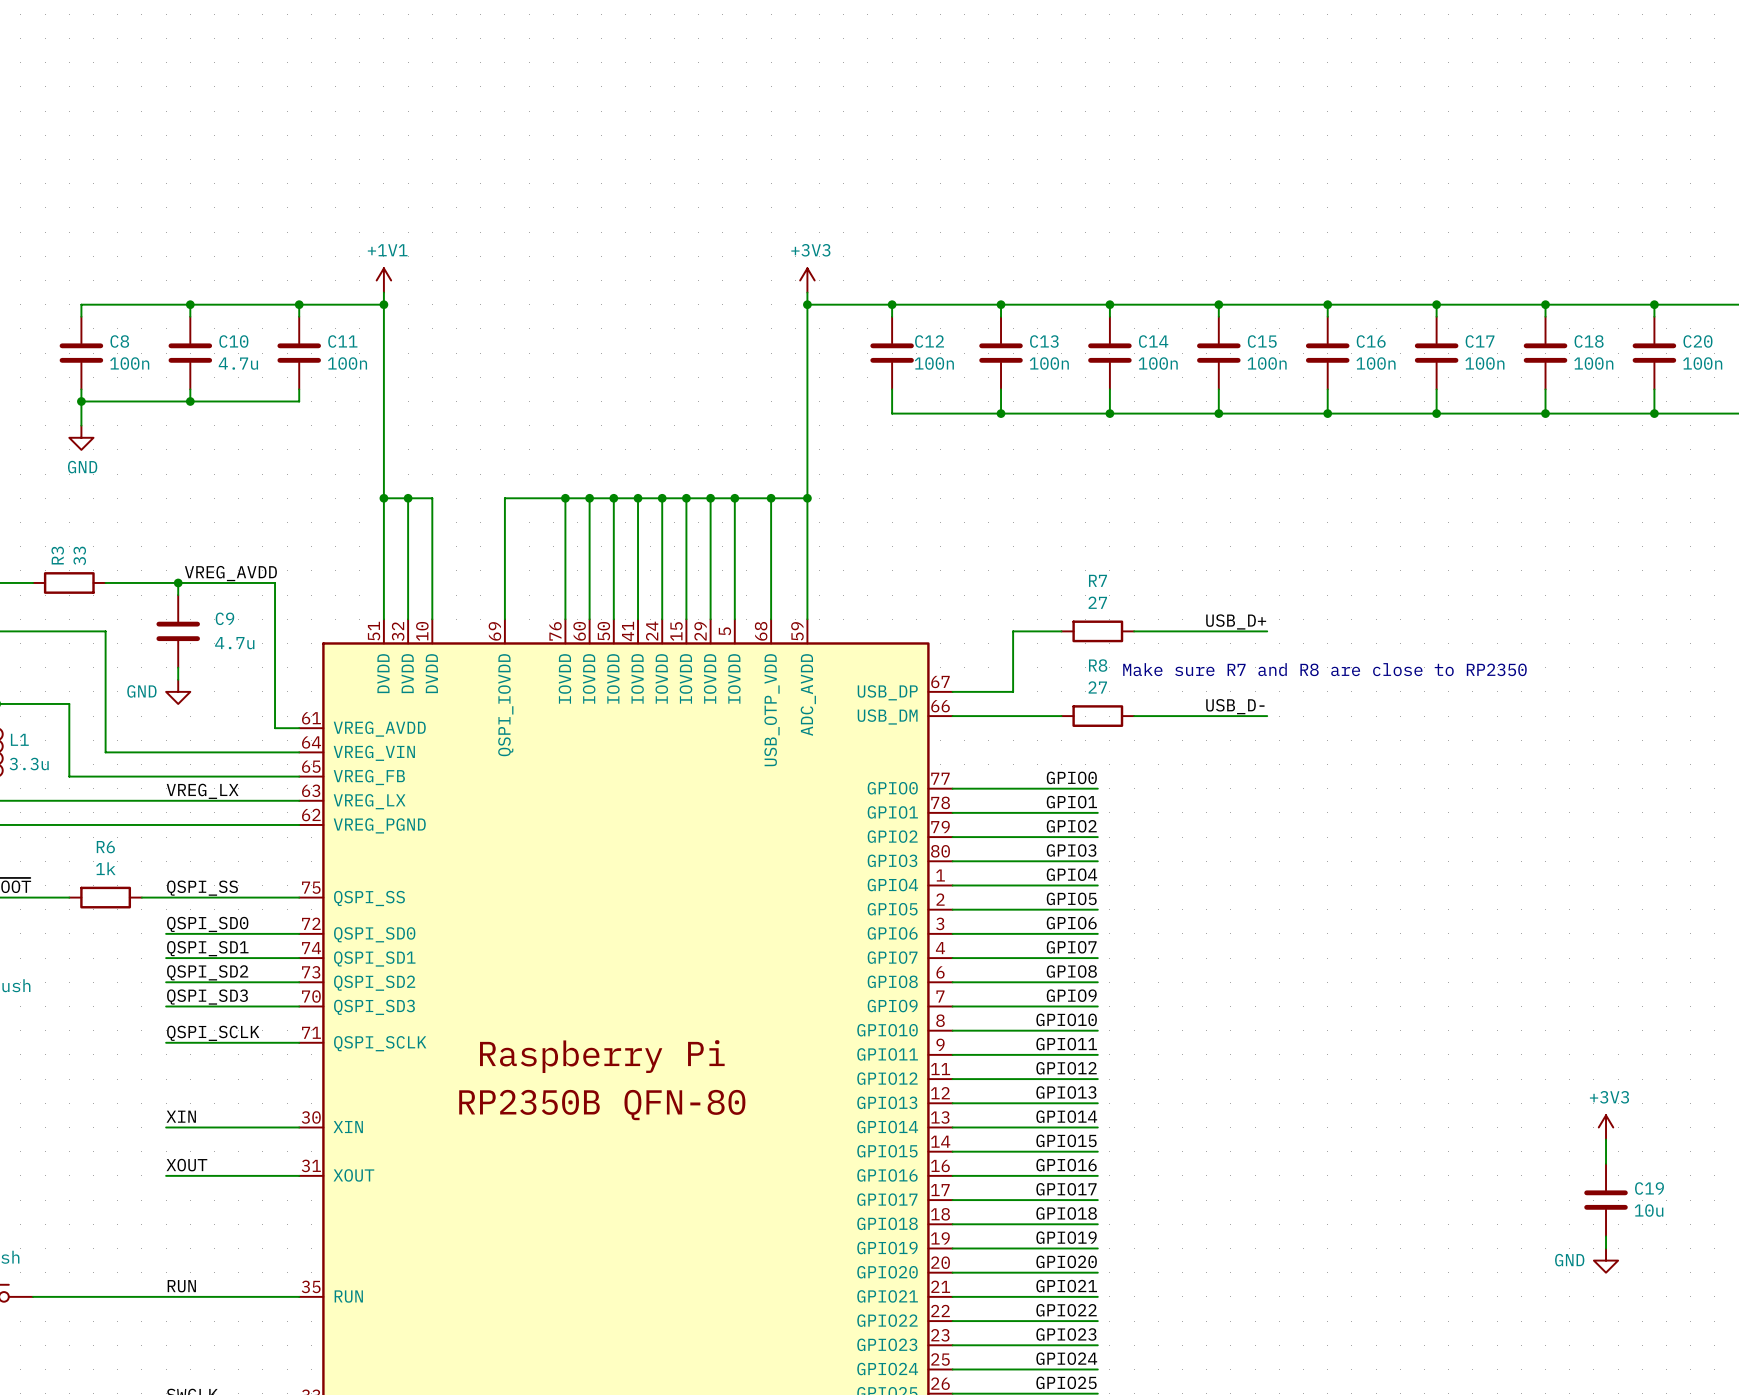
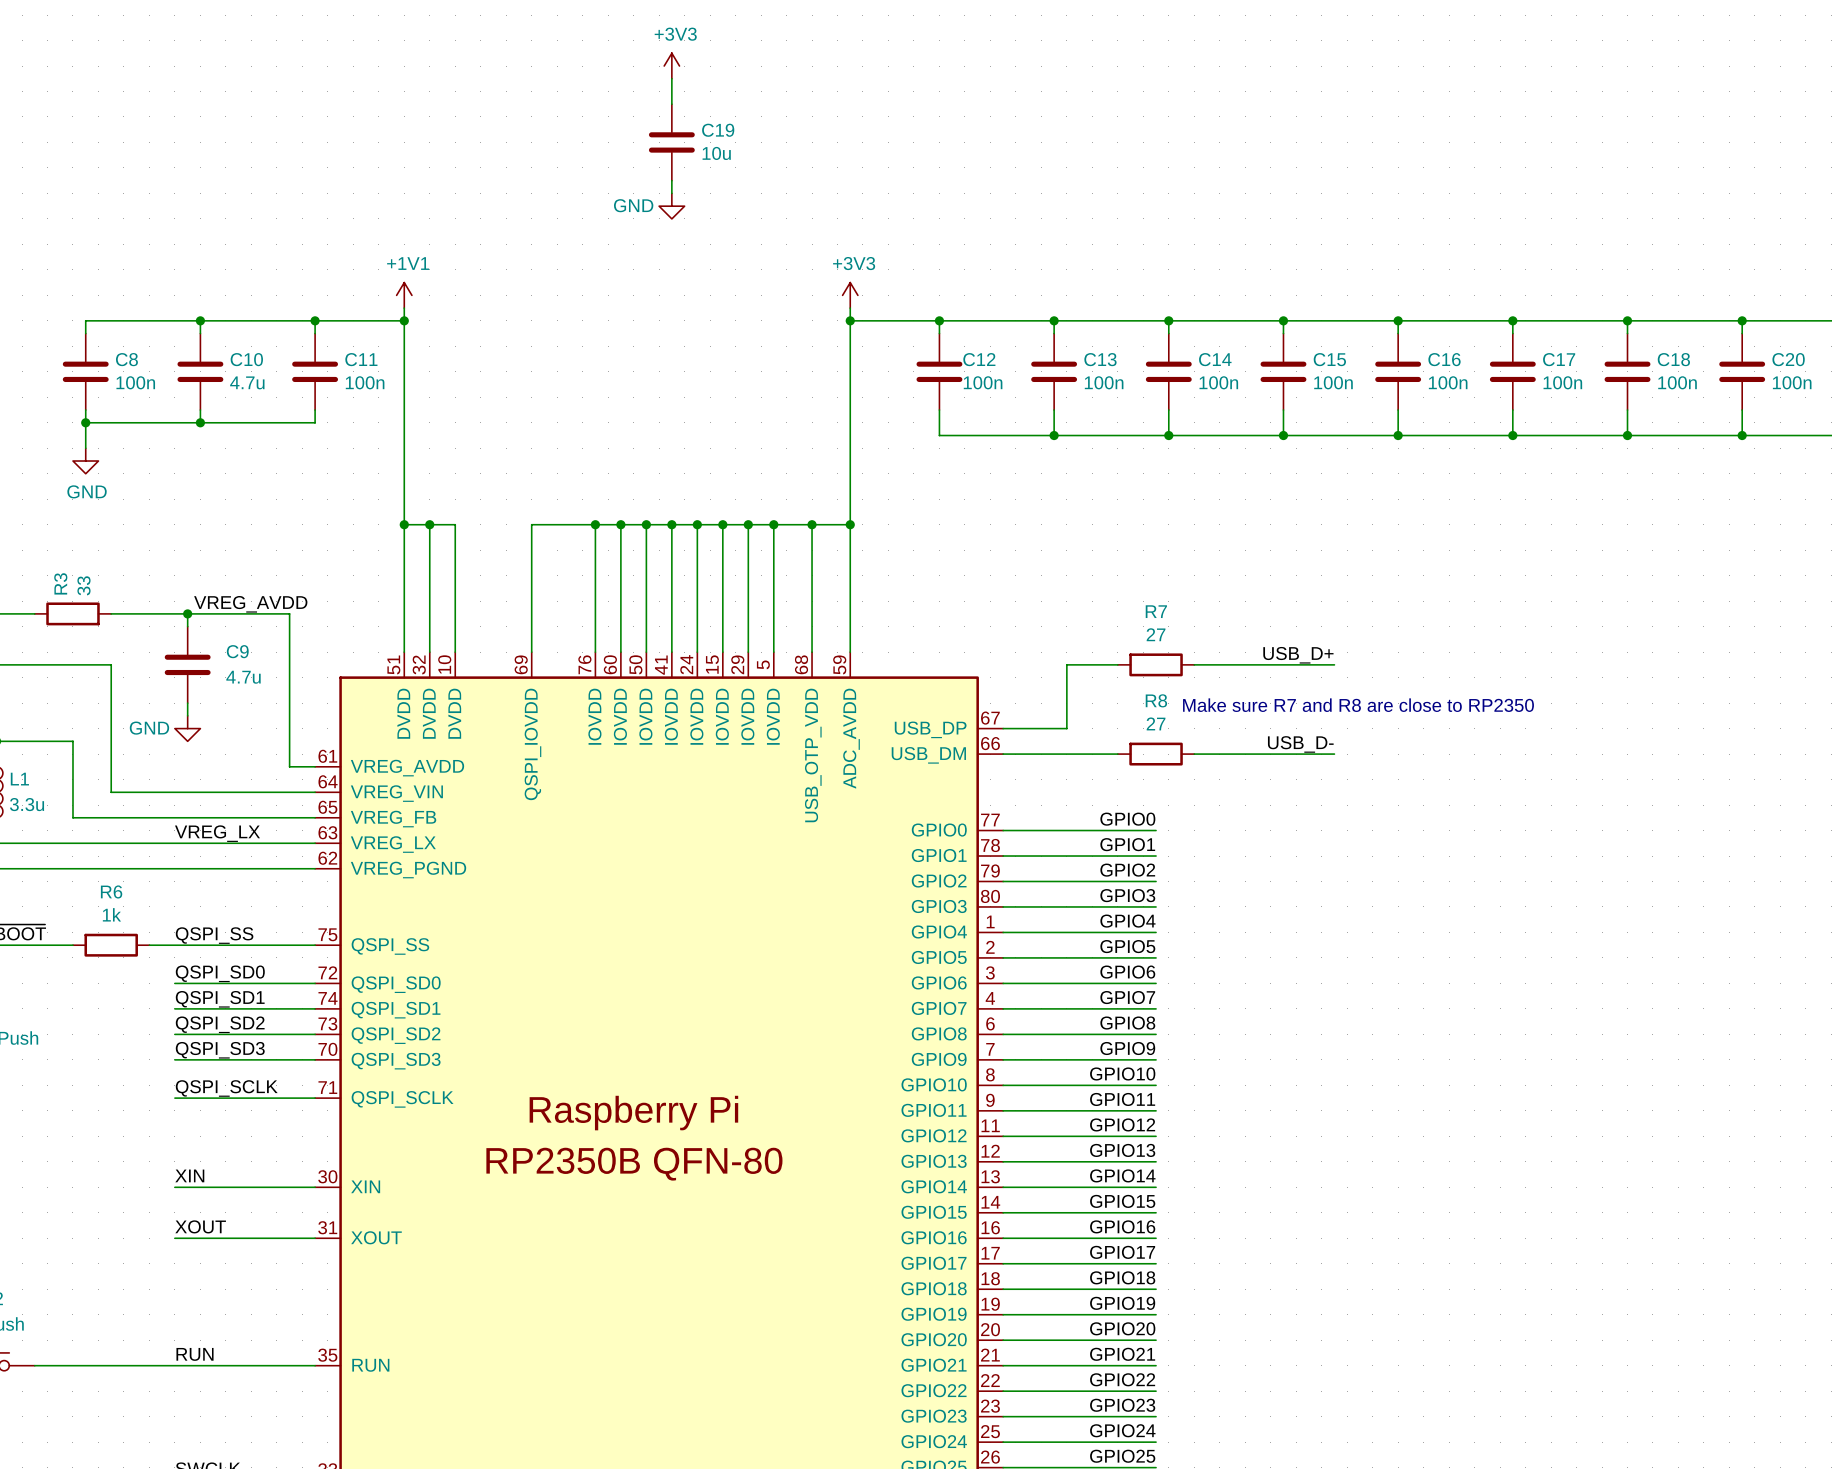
power symbol: none -> +3V3 (671, 66)
wire: none -> (671, 78) (671, 104)
wire: none -> (671, 180) (671, 193)
power symbol: none -> GND (671, 206)
power symbol: +3V3 (1606, 1127) -> none
wire: (1606, 1139) (1606, 1163) -> none
C19 position: (1606, 1200) -> (671, 142)
wire: (1606, 1236) (1606, 1248) -> none
power symbol: GND (1606, 1260) -> none

